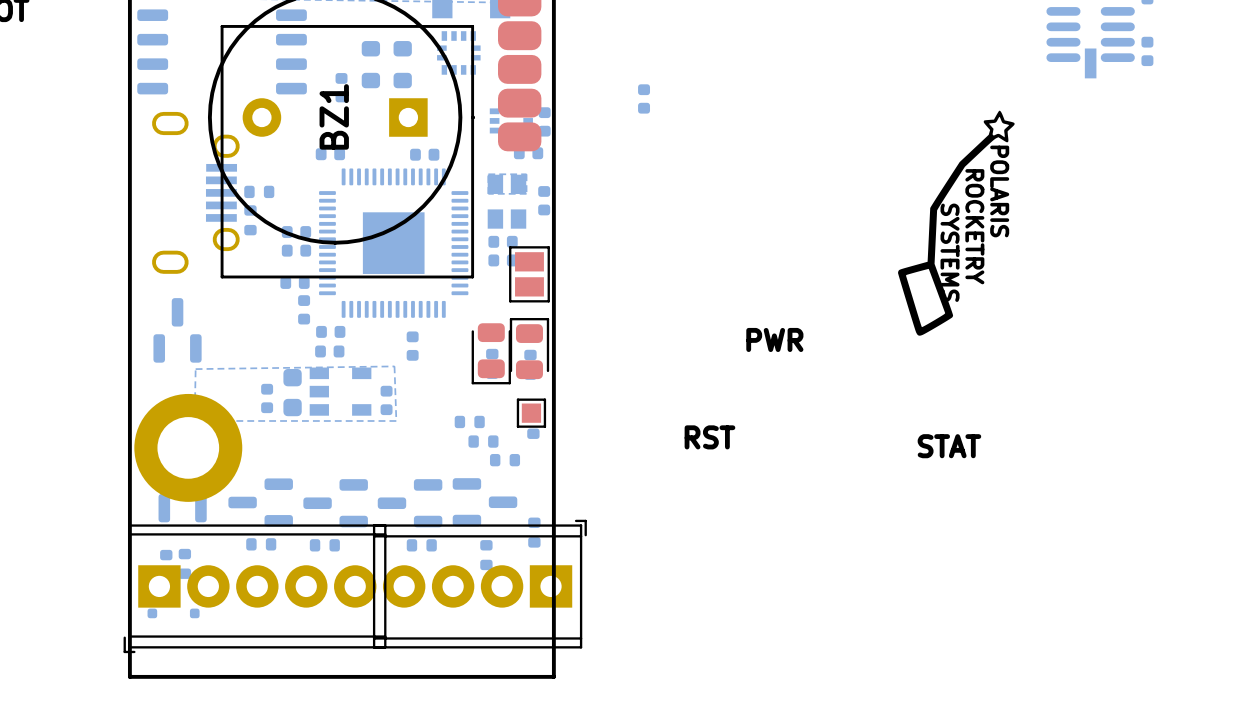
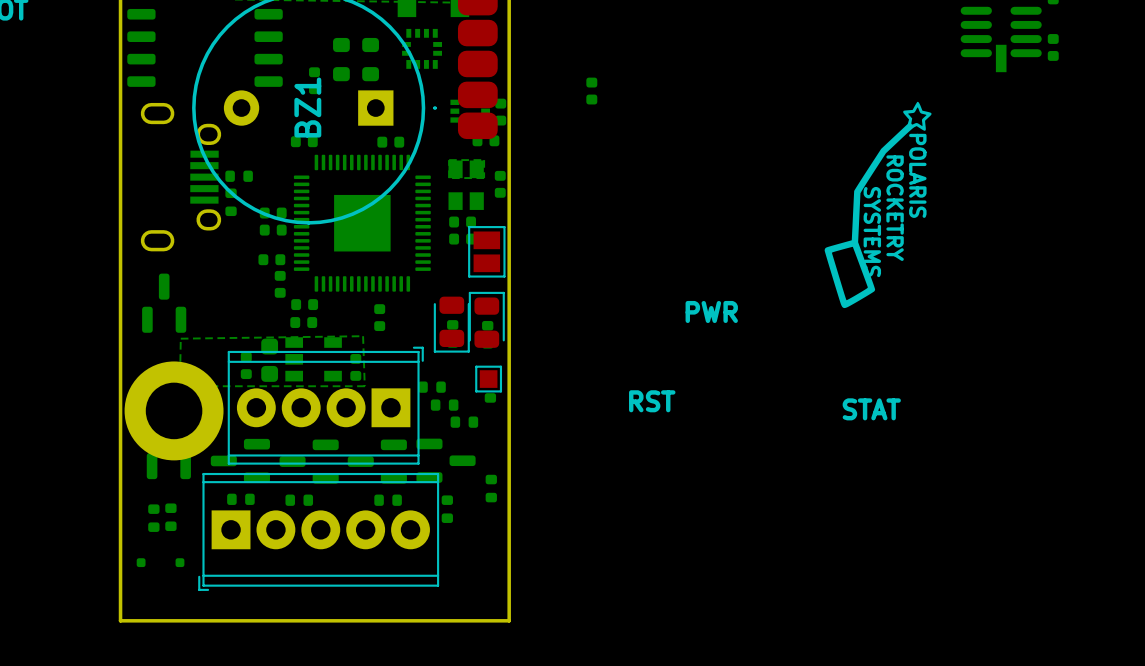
line: (222, 26) (472, 26) (472, 276) (222, 276) (222, 26) -> none
part position: (479, 584) -> (325, 405)
part position: (255, 588) -> (318, 531)

